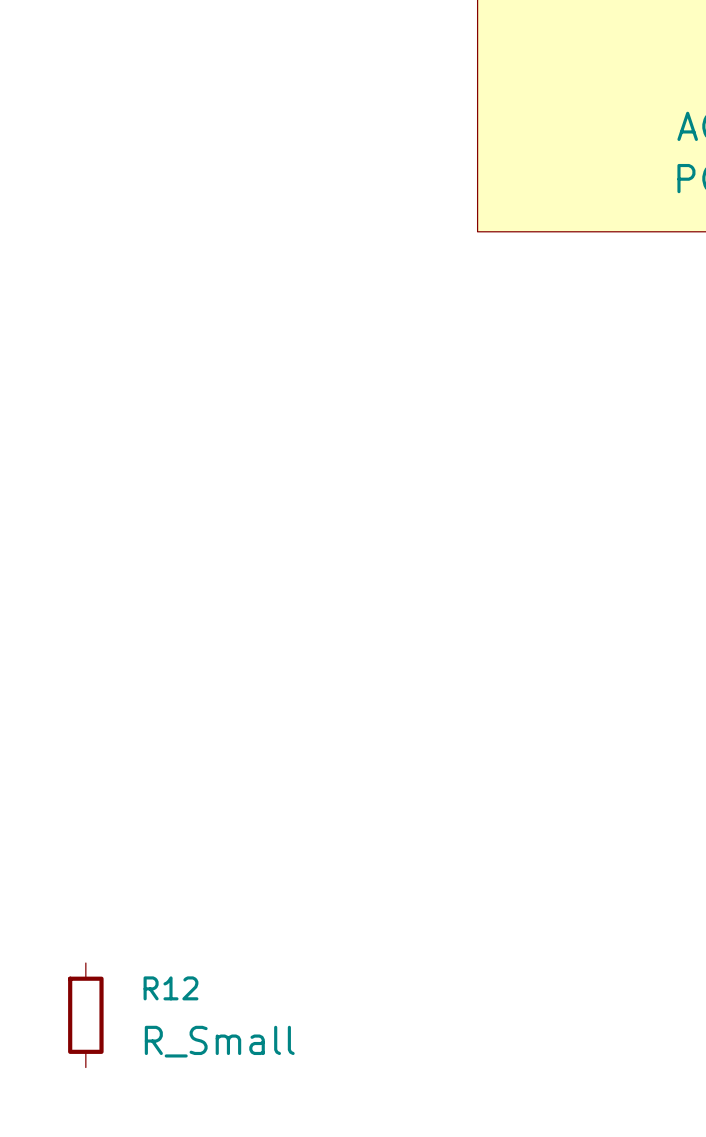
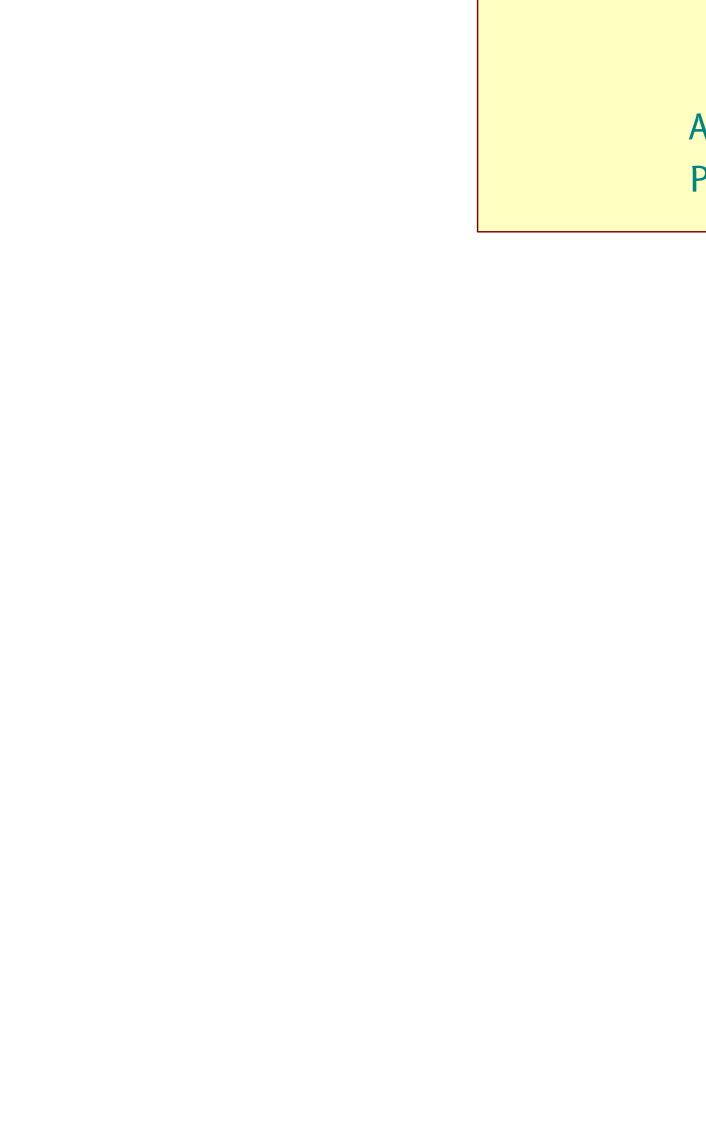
R12: R_Small (85, 1015) -> none

